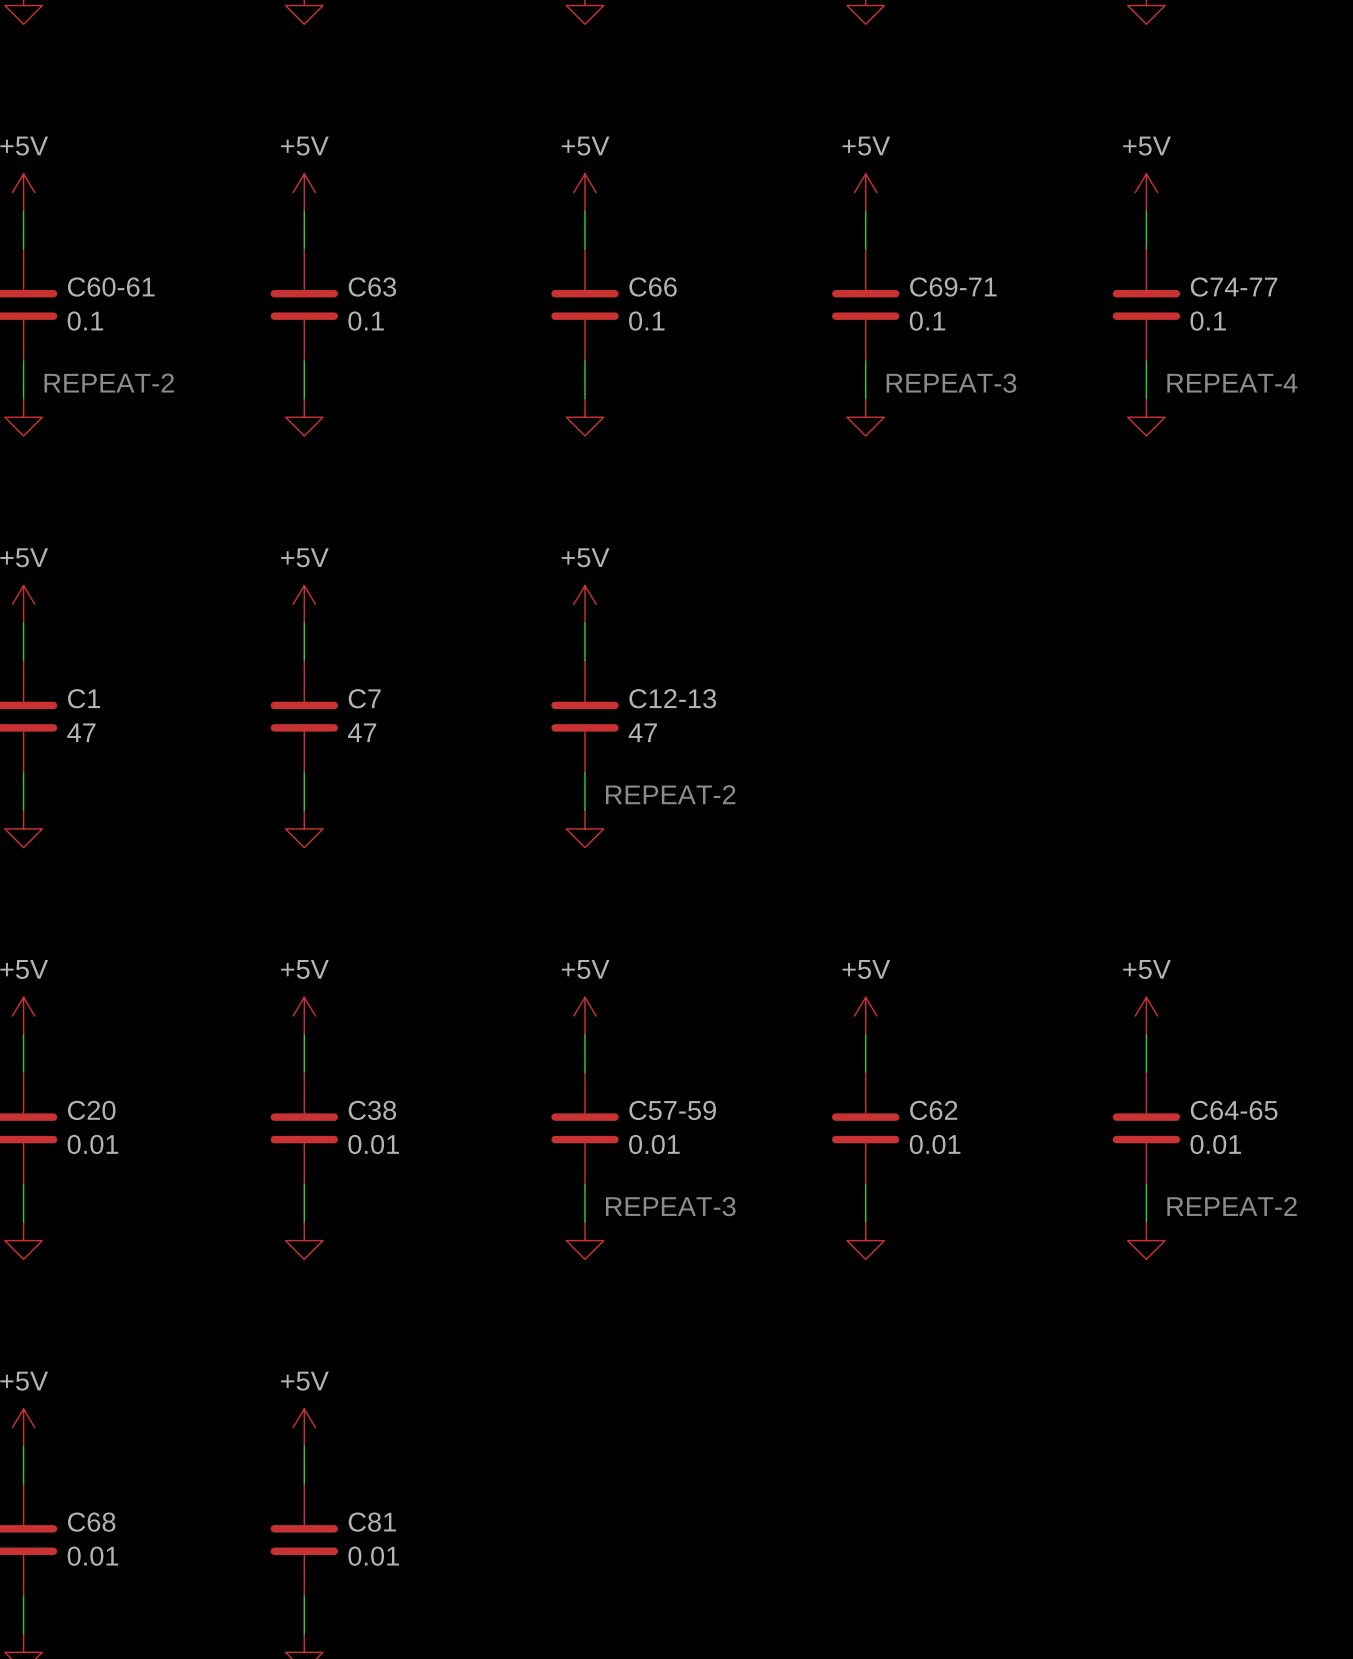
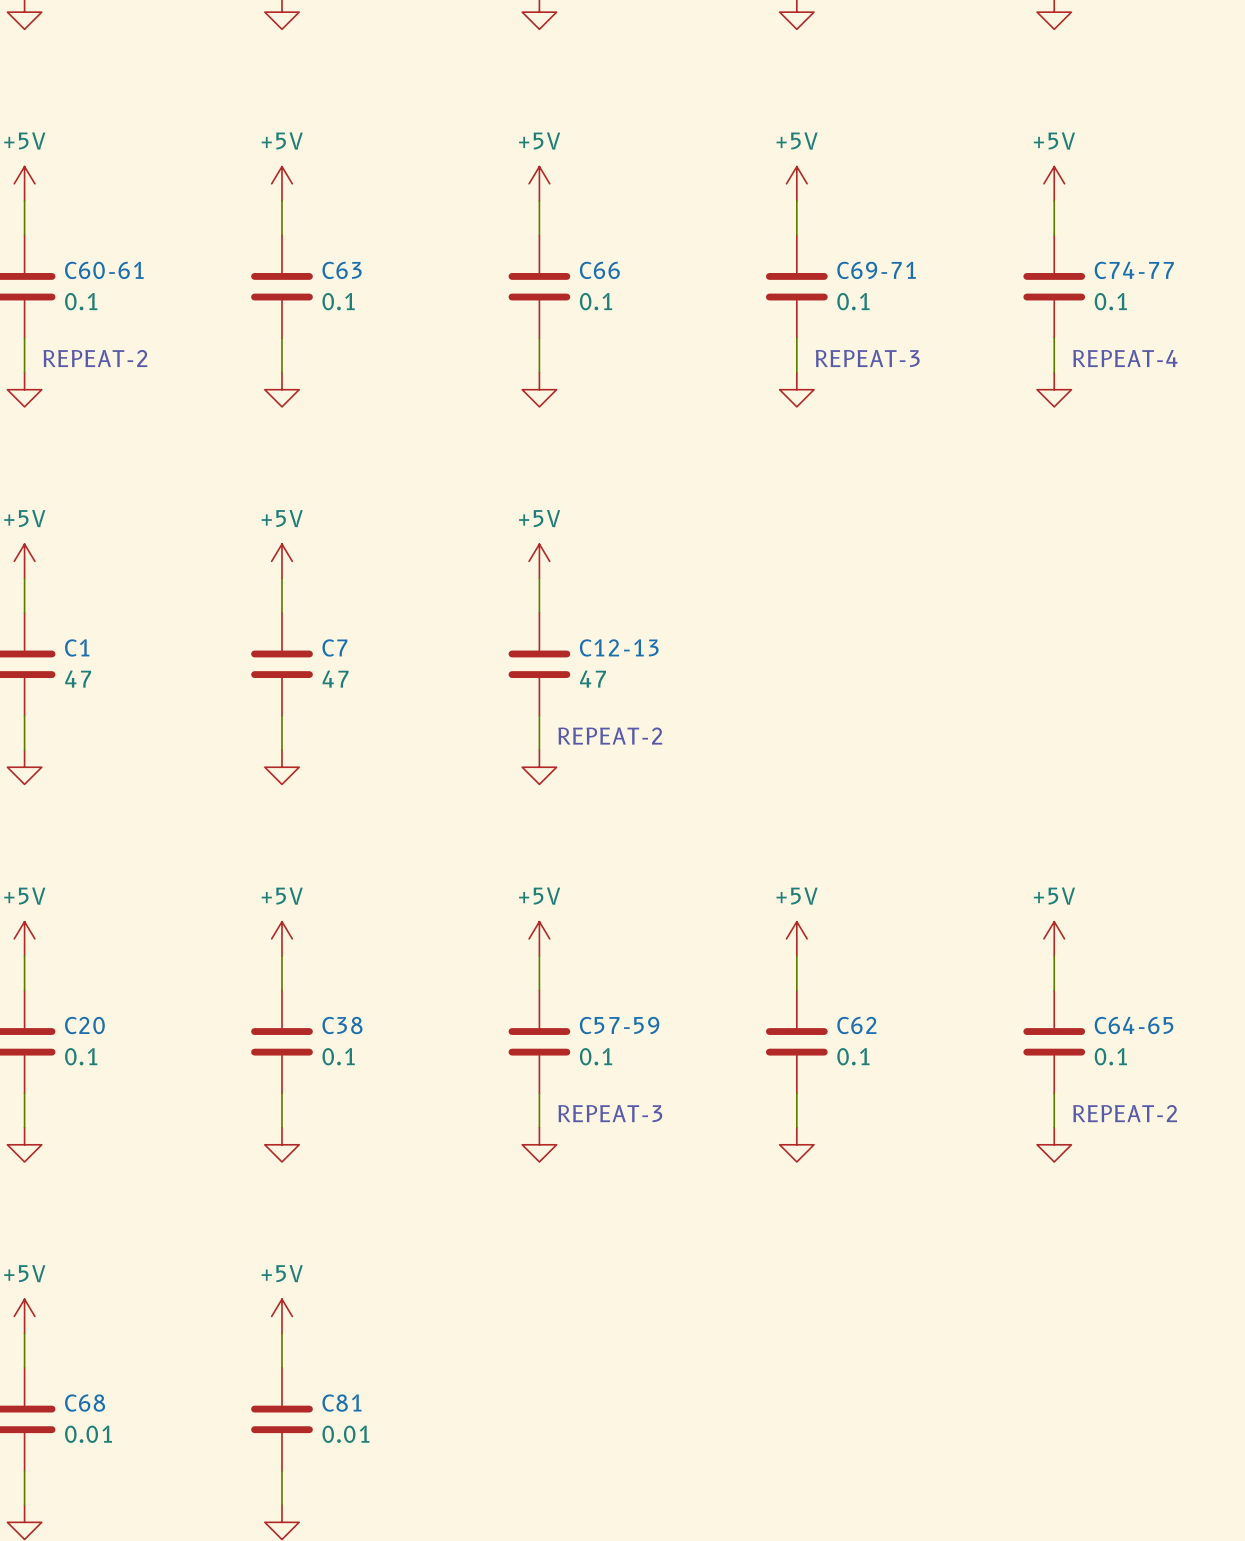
C20 value: 0.01 (92, 1144) -> 0.1 (81, 1056)
C38 value: 0.01 (373, 1144) -> 0.1 (338, 1056)
C57-59 value: 0.01 (654, 1144) -> 0.1 (596, 1056)
C62 value: 0.01 (935, 1144) -> 0.1 (853, 1056)
C64-65 value: 0.01 (1215, 1144) -> 0.1 (1110, 1056)

